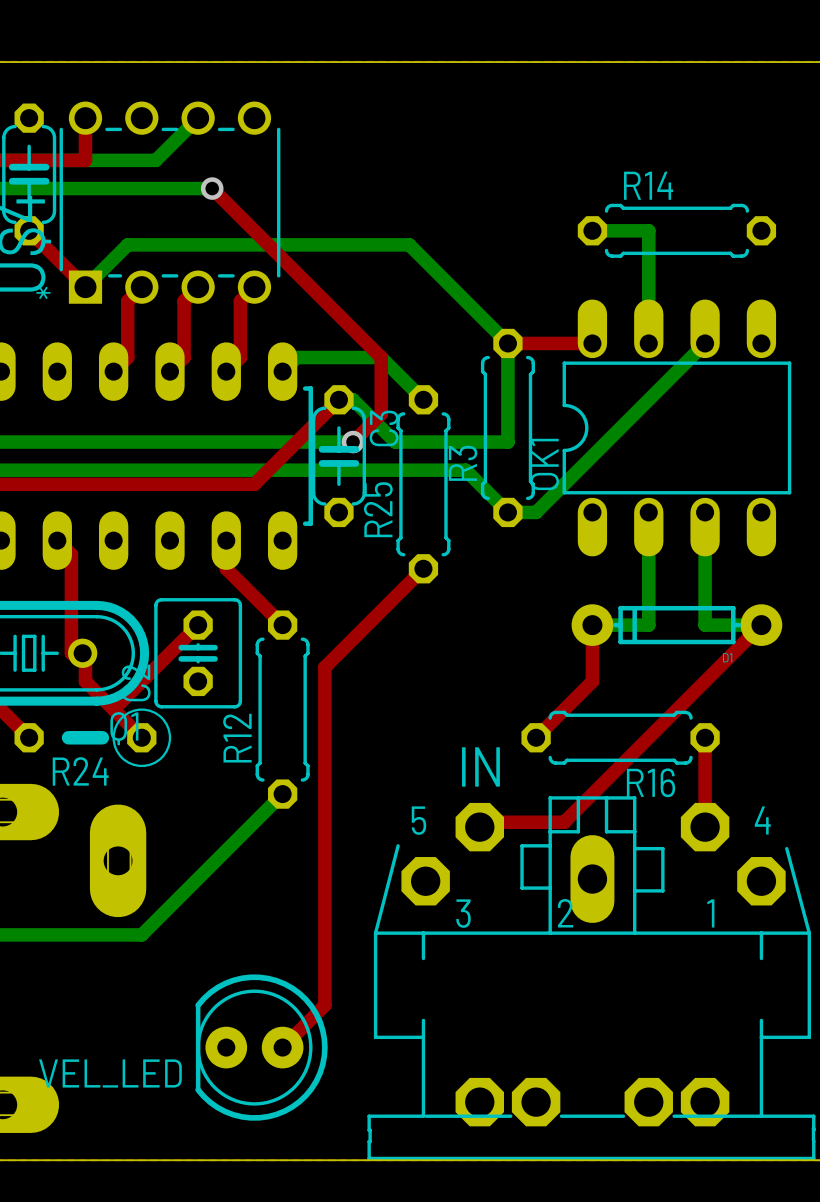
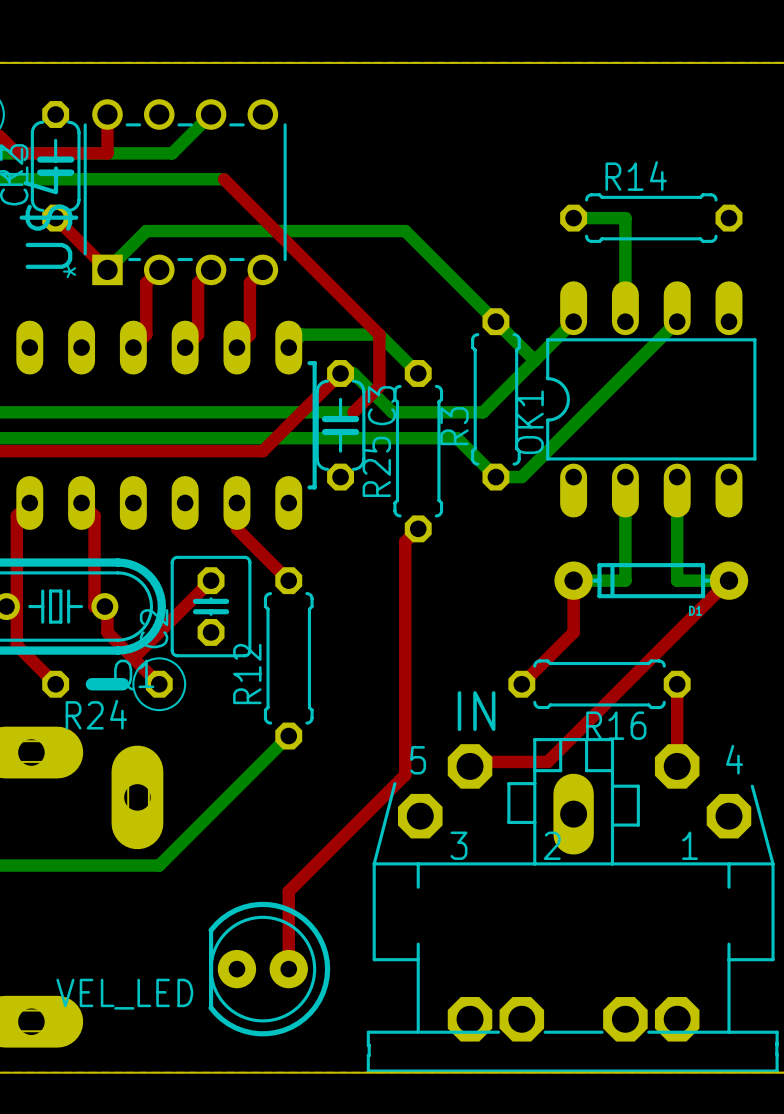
via: (212, 188) -> none
bottom track: (507, 343) (507, 442) (493, 442) -> (495, 321) (534, 360)
top track: (507, 343) (592, 343) -> none
bottom track: none -> (573, 321) (482, 412)
via: (353, 442) -> none
top track: (409, 582) (324, 667) (324, 1005) (282, 1047) -> (405, 541) (405, 774) (288, 891) (288, 969)

